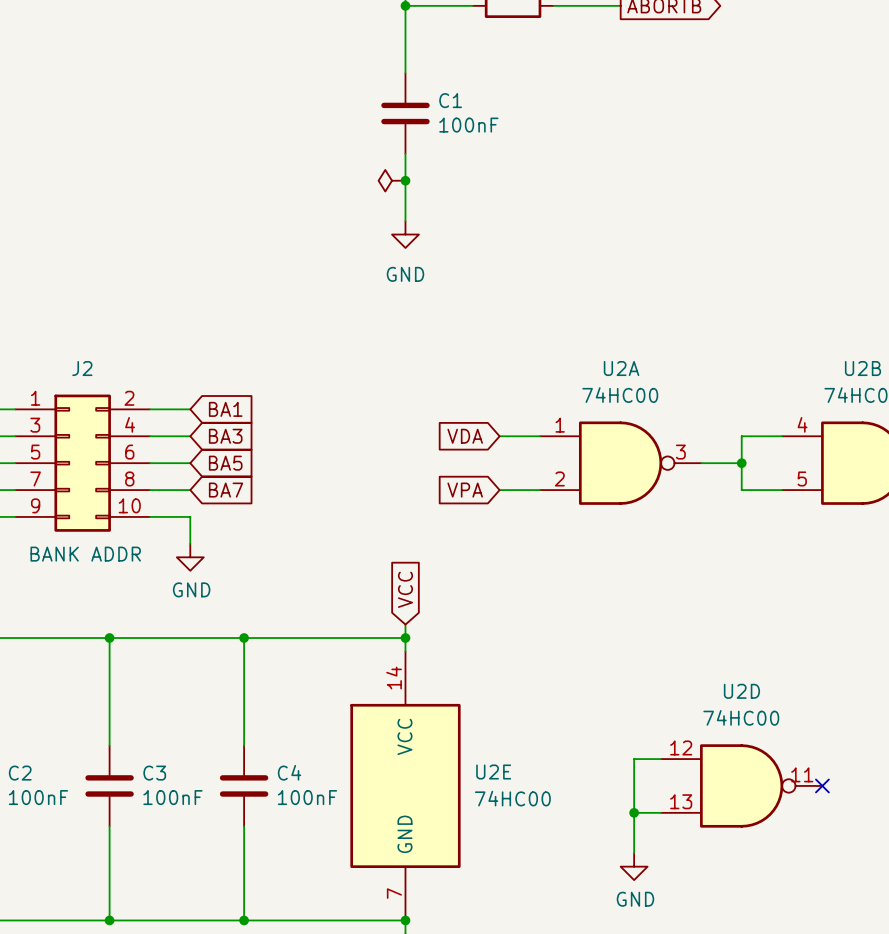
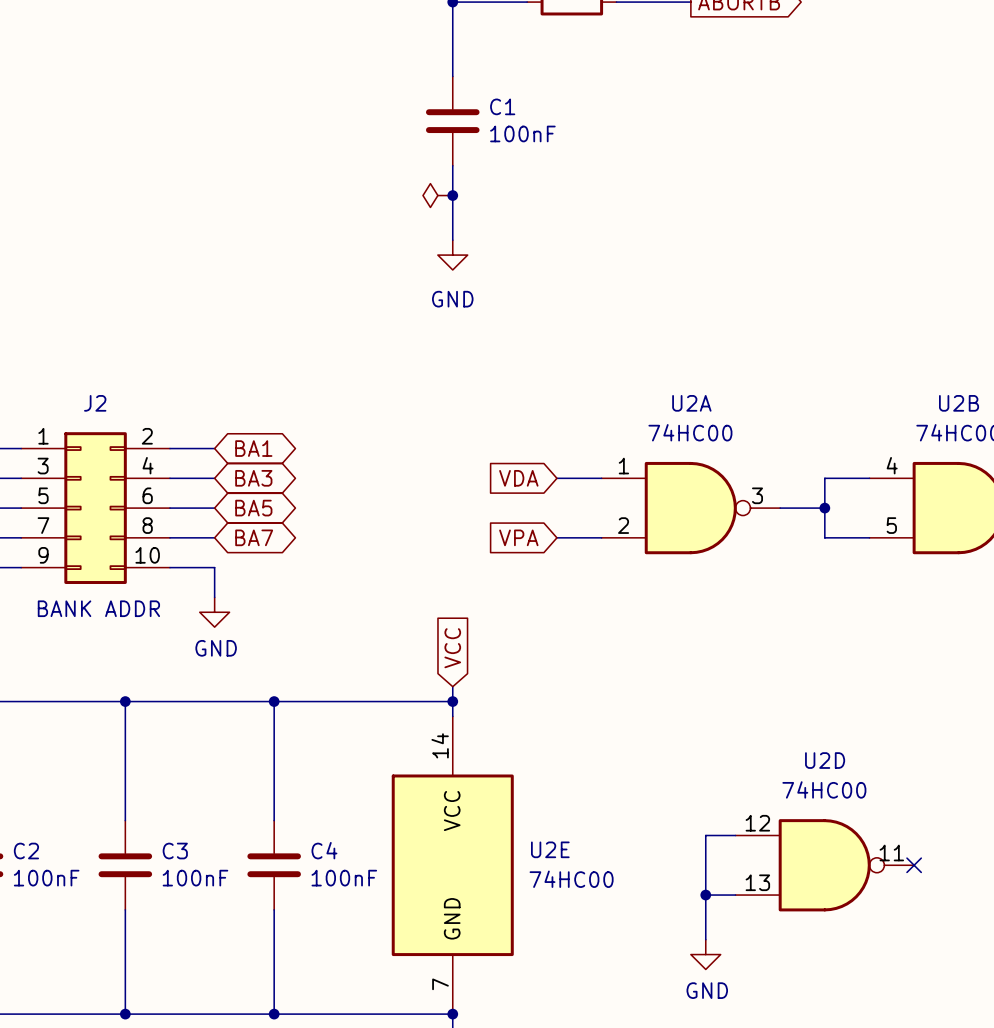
global label shape: input (225, 409) -> bidirectional (253, 448)
global label shape: input (225, 436) -> bidirectional (253, 478)
global label shape: input (225, 463) -> bidirectional (253, 508)
global label shape: input (226, 490) -> bidirectional (254, 537)

